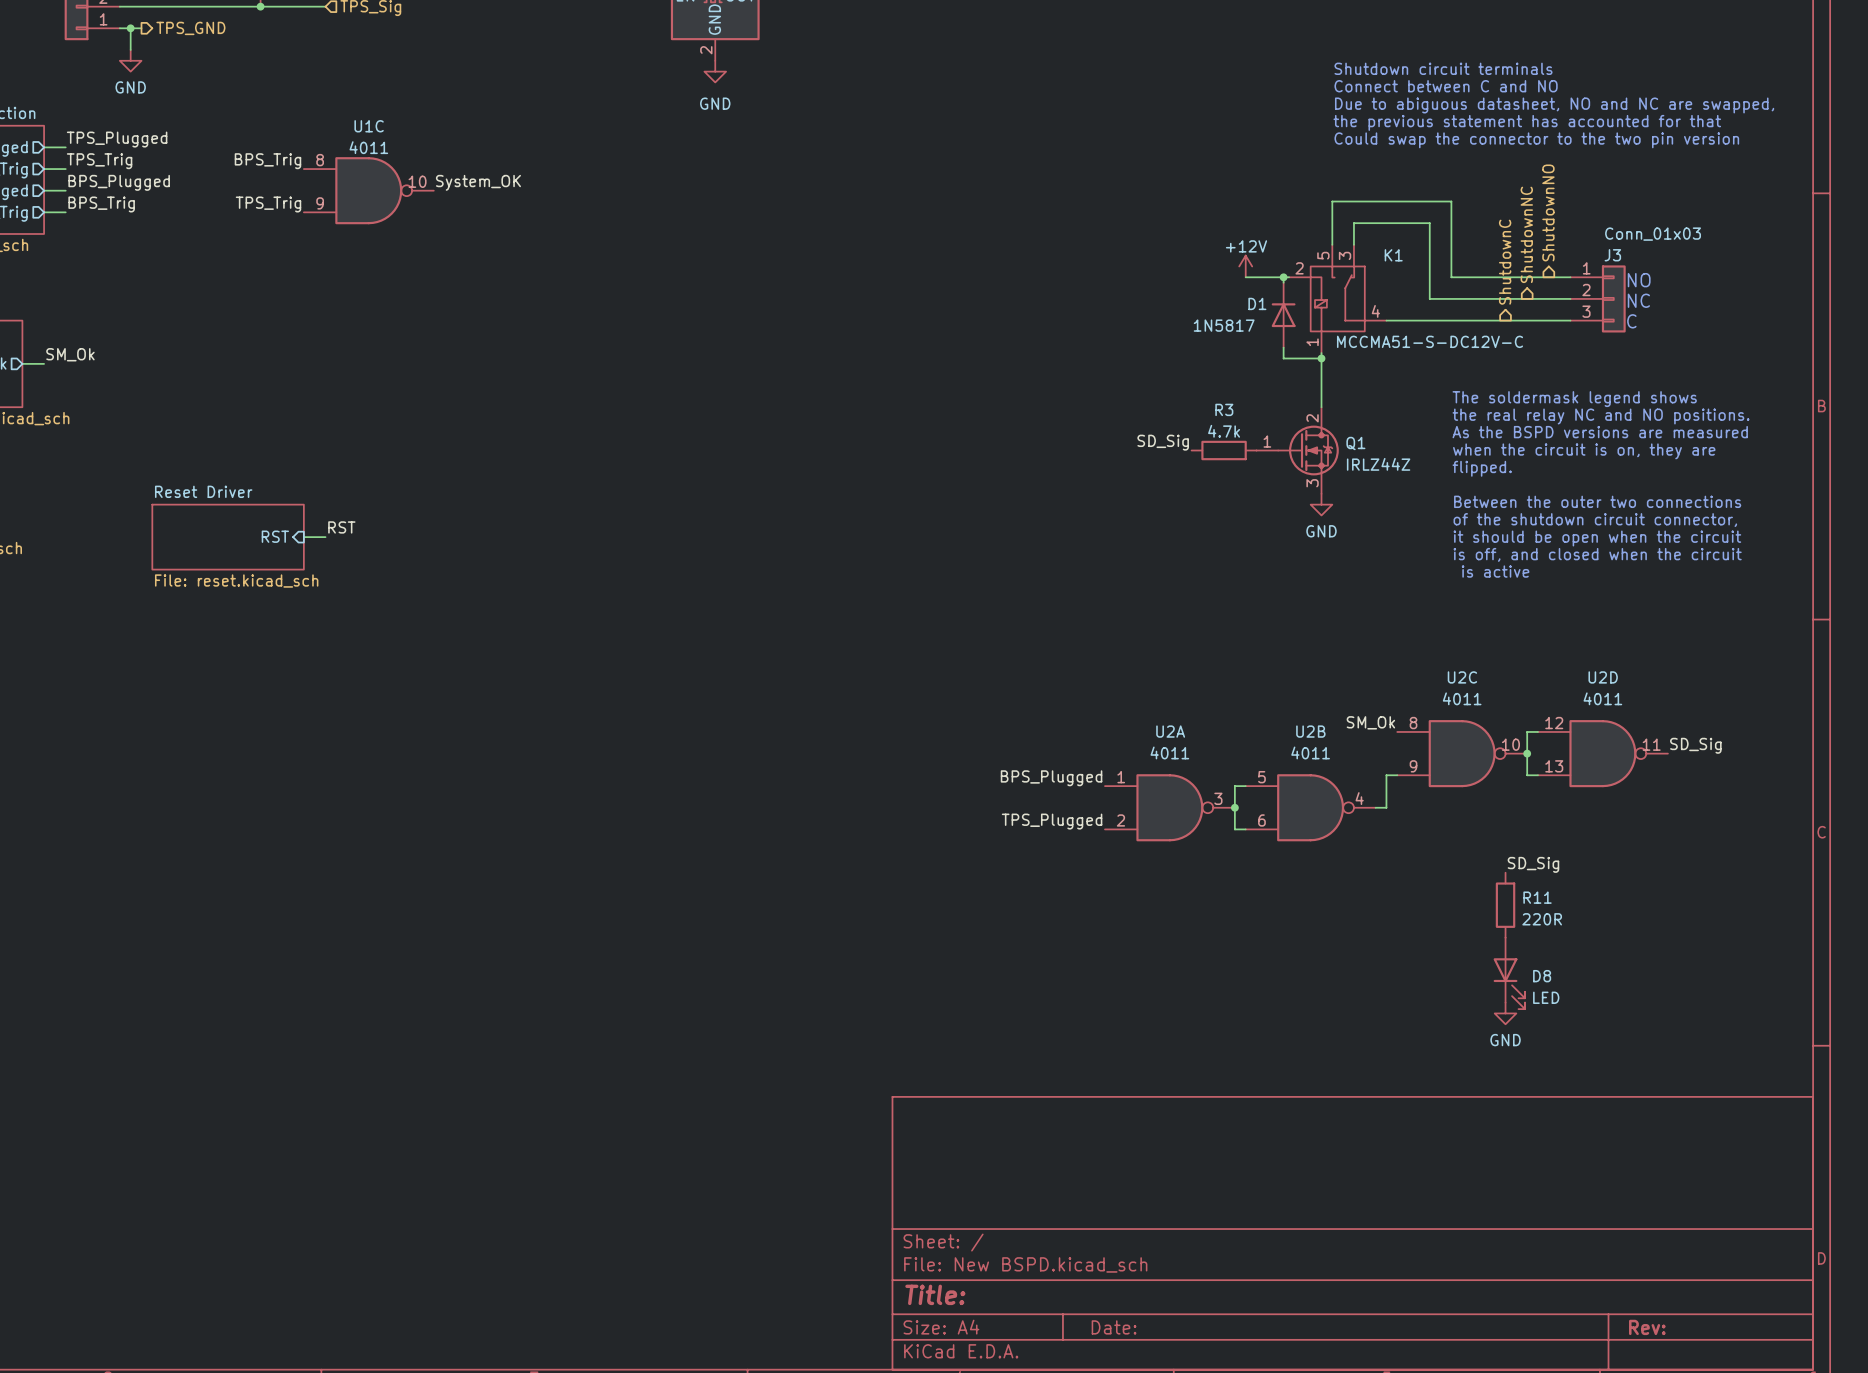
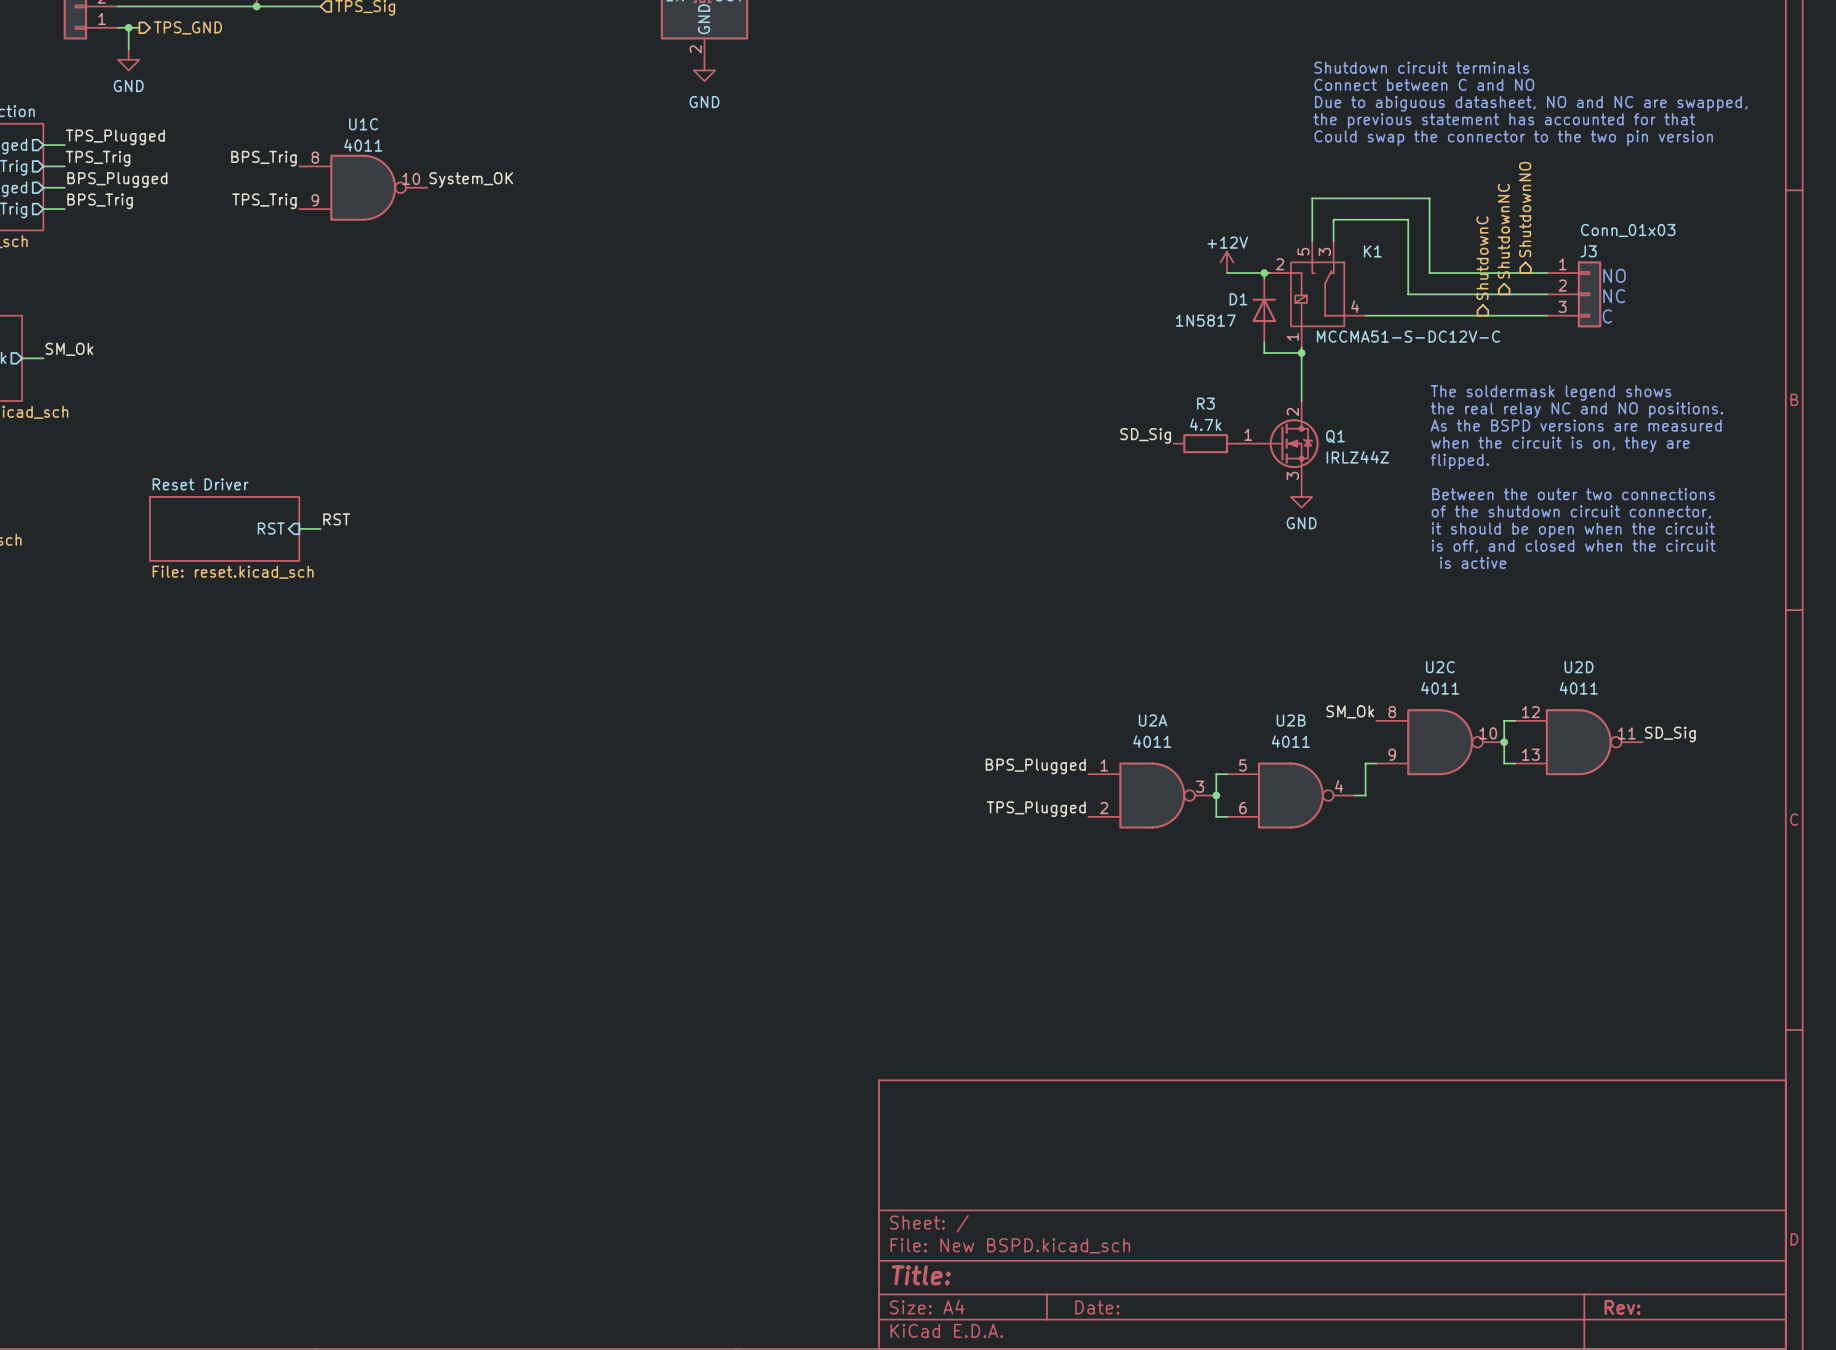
label: SD_Sig (1533, 864) -> none
R11: 220R (1505, 905) -> none
D8: LED (1509, 973) -> none
power symbol: GND (1505, 1013) -> none

